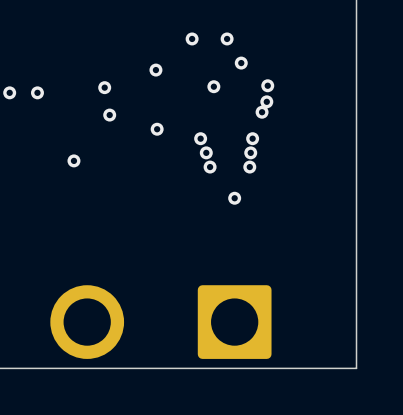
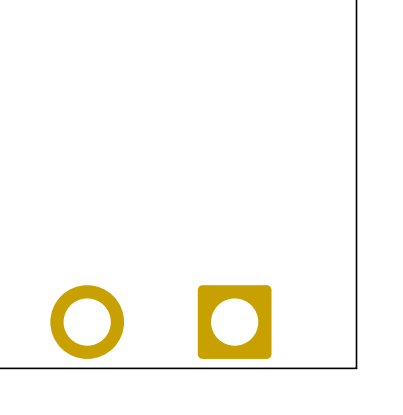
via: (192, 38) -> none
via: (227, 38) -> none
via: (241, 63) -> none
via: (155, 70) -> none
via: (267, 85) -> none
via: (213, 86) -> none
via: (104, 87) -> none
via: (9, 92) -> none
via: (37, 92) -> none
via: (266, 101) -> none
via: (262, 112) -> none
via: (109, 115) -> none
via: (157, 129) -> none
via: (200, 138) -> none
via: (252, 138) -> none
via: (206, 152) -> none
via: (250, 152) -> none
via: (73, 160) -> none
via: (210, 167) -> none
via: (249, 167) -> none
via: (234, 198) -> none

